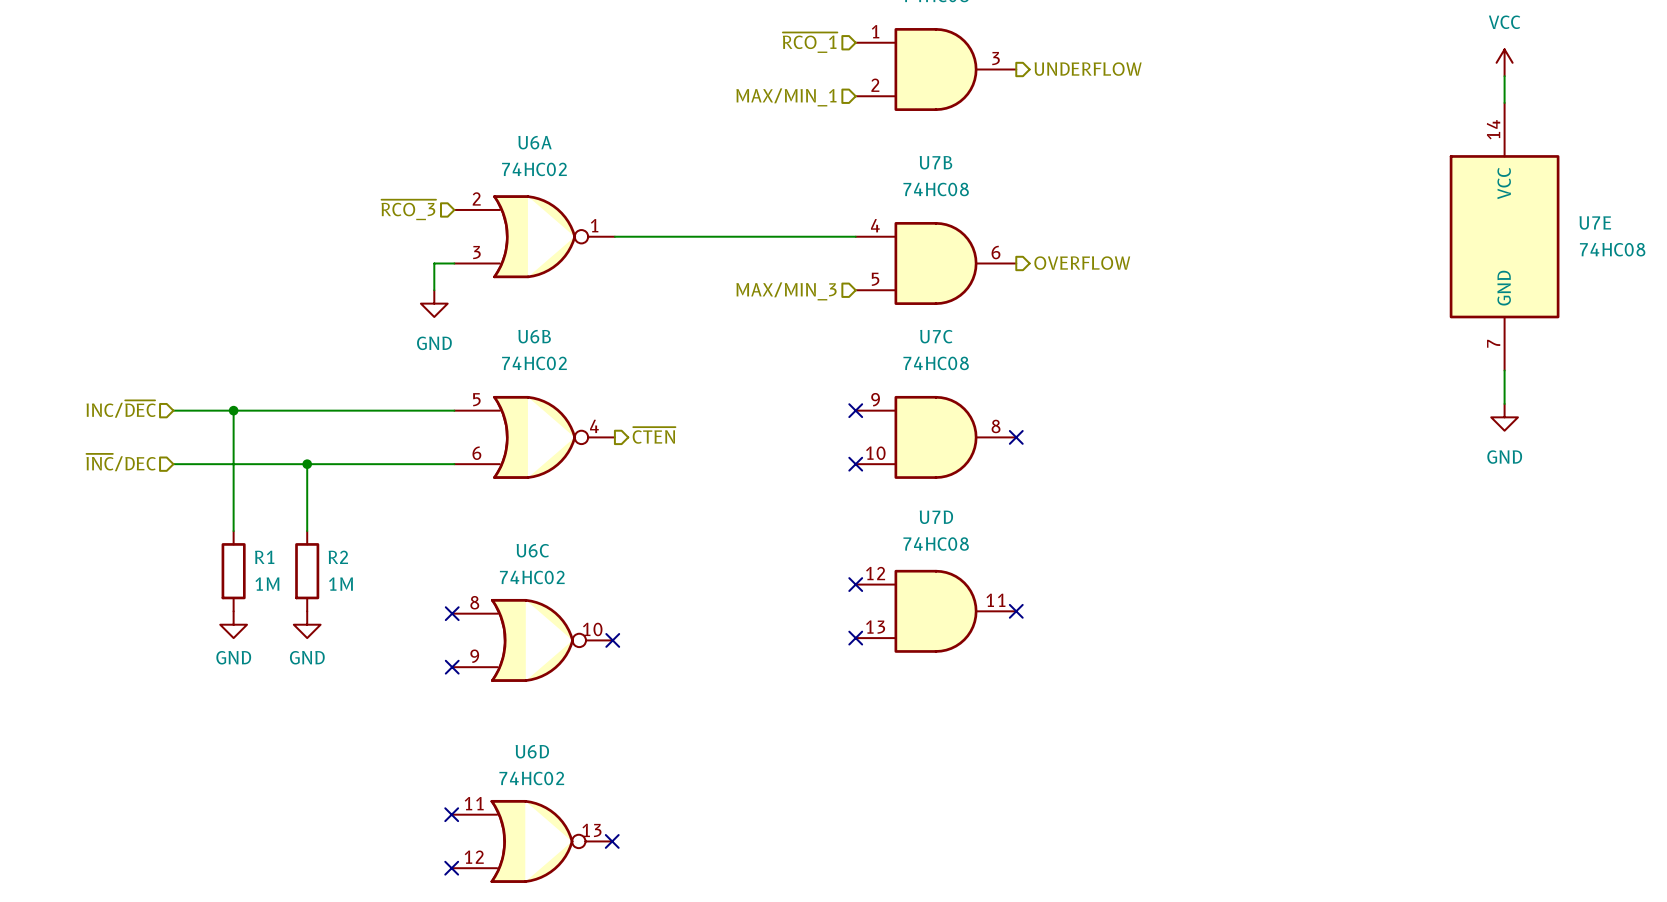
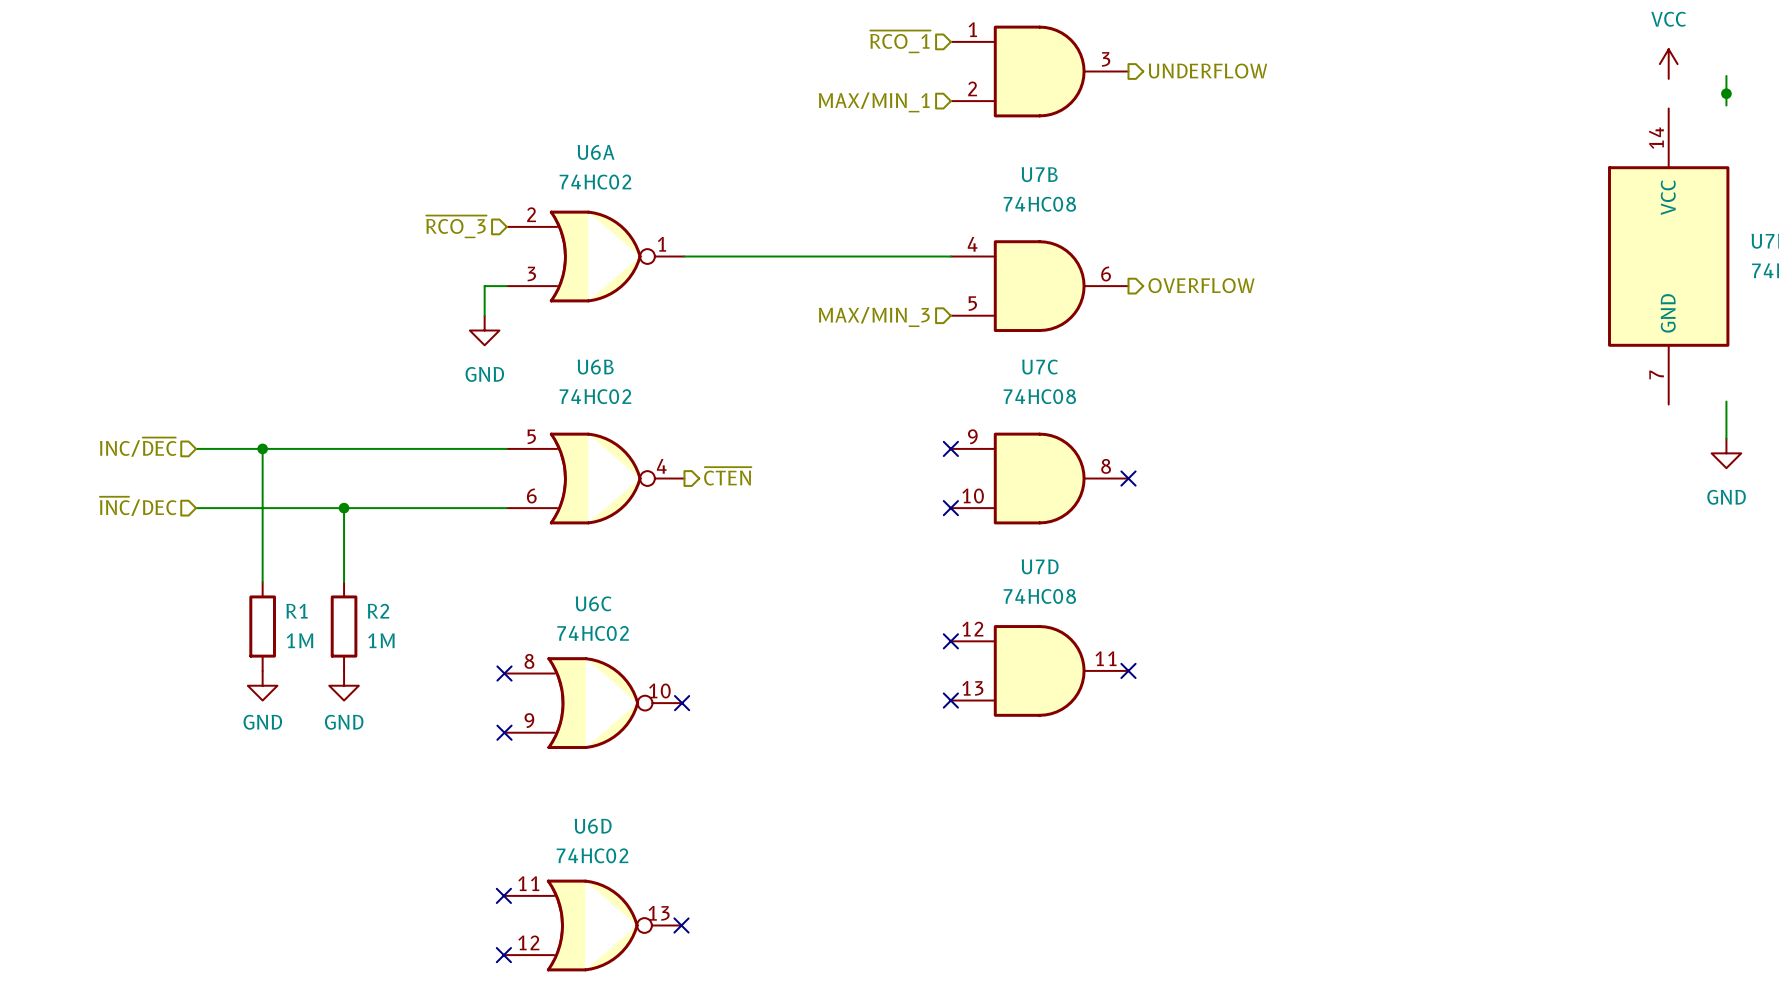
wire: (1504, 76) (1504, 102) -> (1726, 75) (1726, 105)
junction: none -> (1726, 93)
wire: (1504, 370) (1504, 403) -> (1726, 401) (1726, 438)
power symbol position: GND (1504, 417) -> GND (1726, 453)

